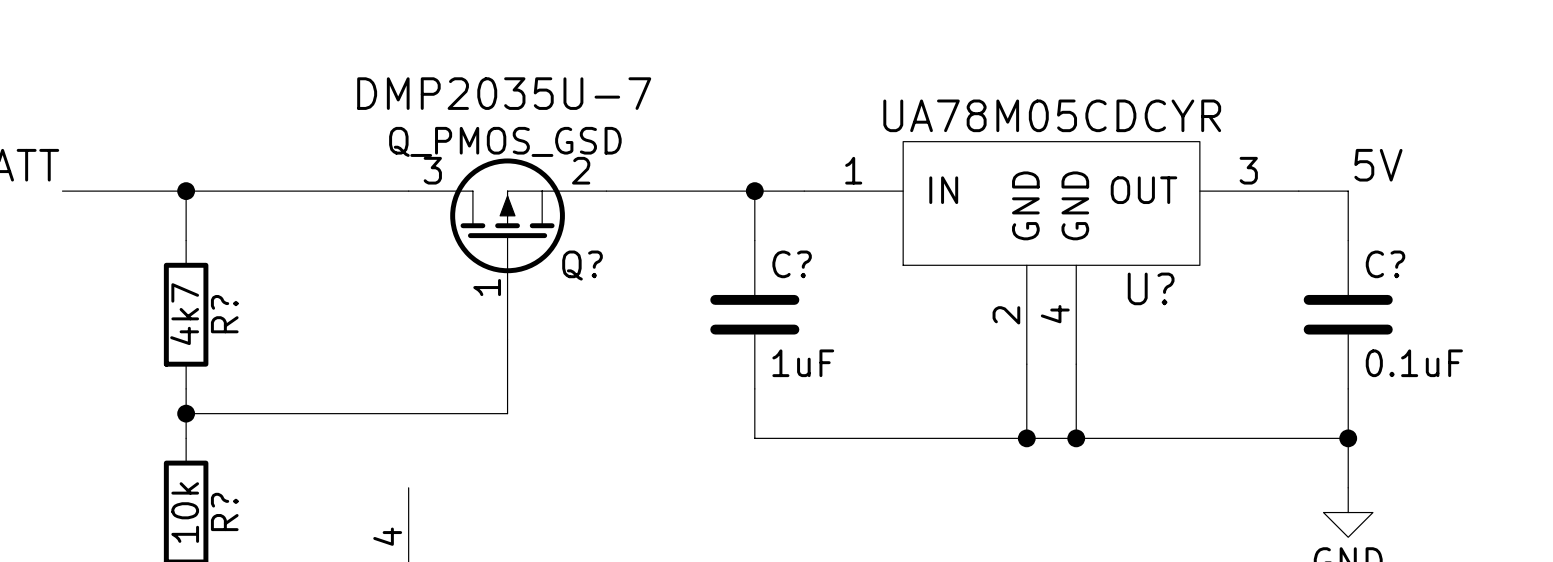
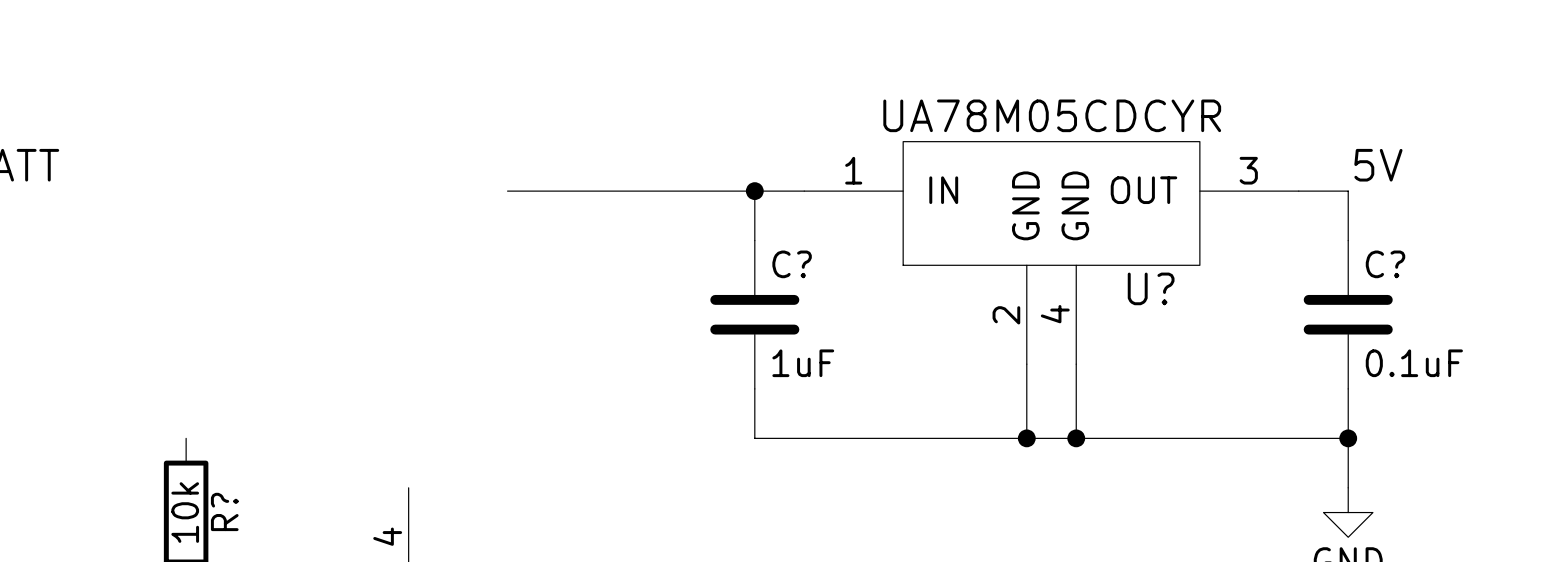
text: DMP2035U-7 (504, 93) -> none
wire: (62, 191) (408, 191) -> none
wire: (186, 191) (186, 240) -> none
junction: (186, 191) -> none
Q?: Q_PMOS_GSD (507, 248) -> none
R?: 4k7 (186, 314) -> none
wire: (507, 339) (507, 413) (186, 413) -> none
wire: (186, 388) (186, 438) -> none
junction: (186, 413) -> none

